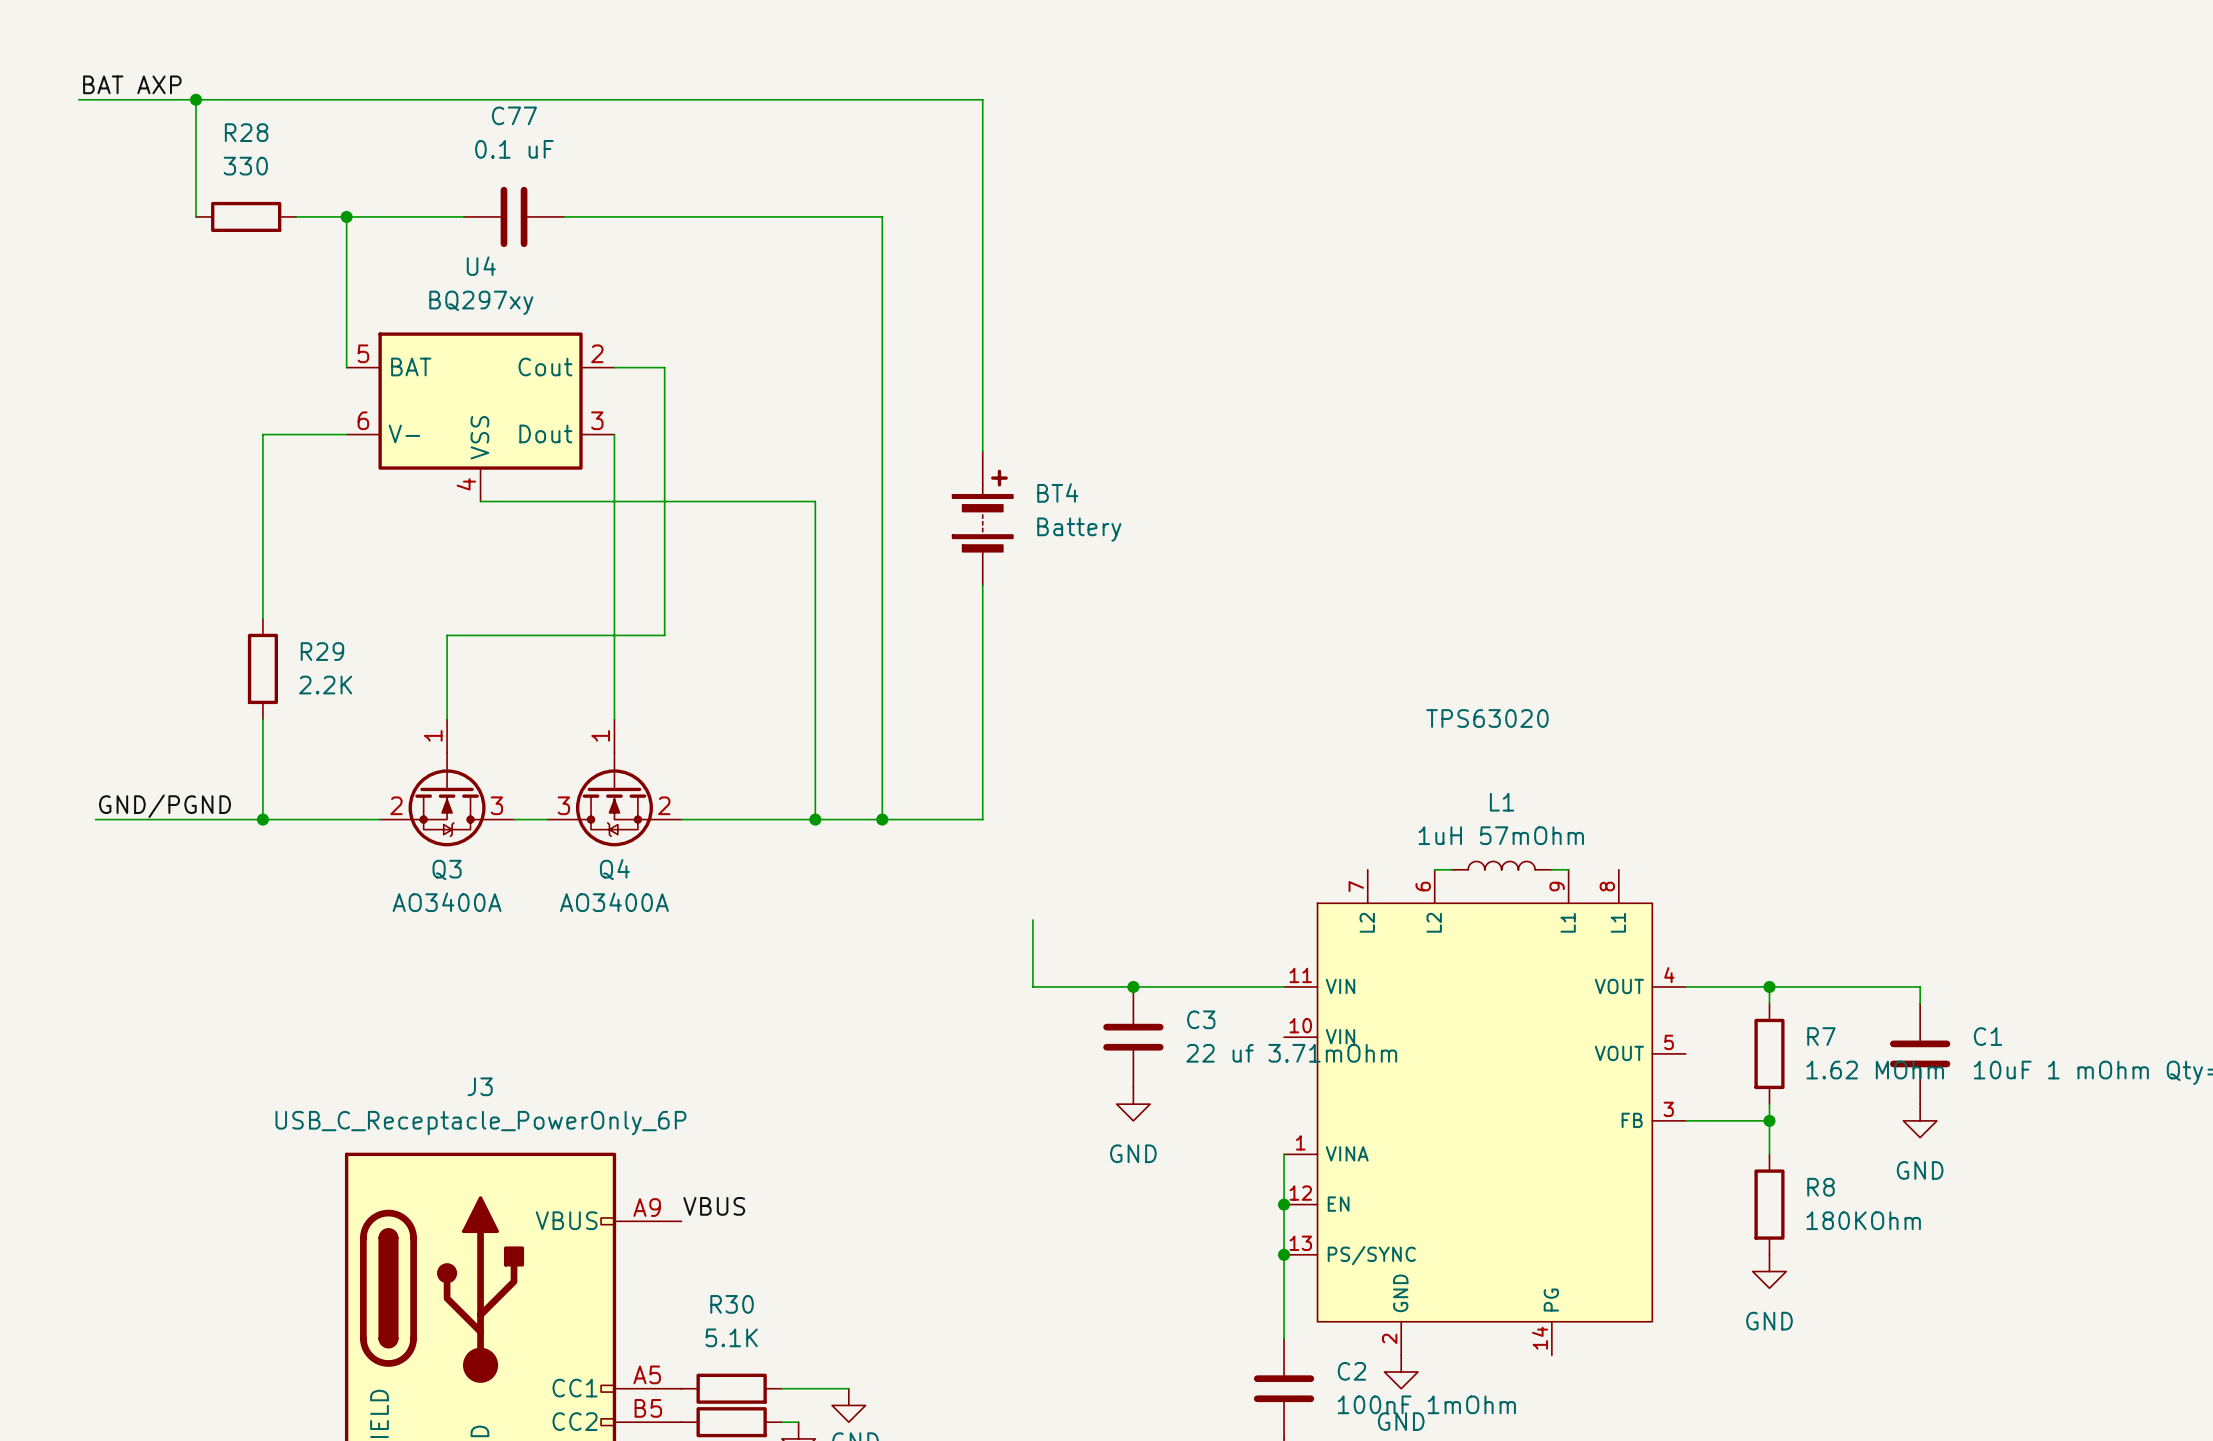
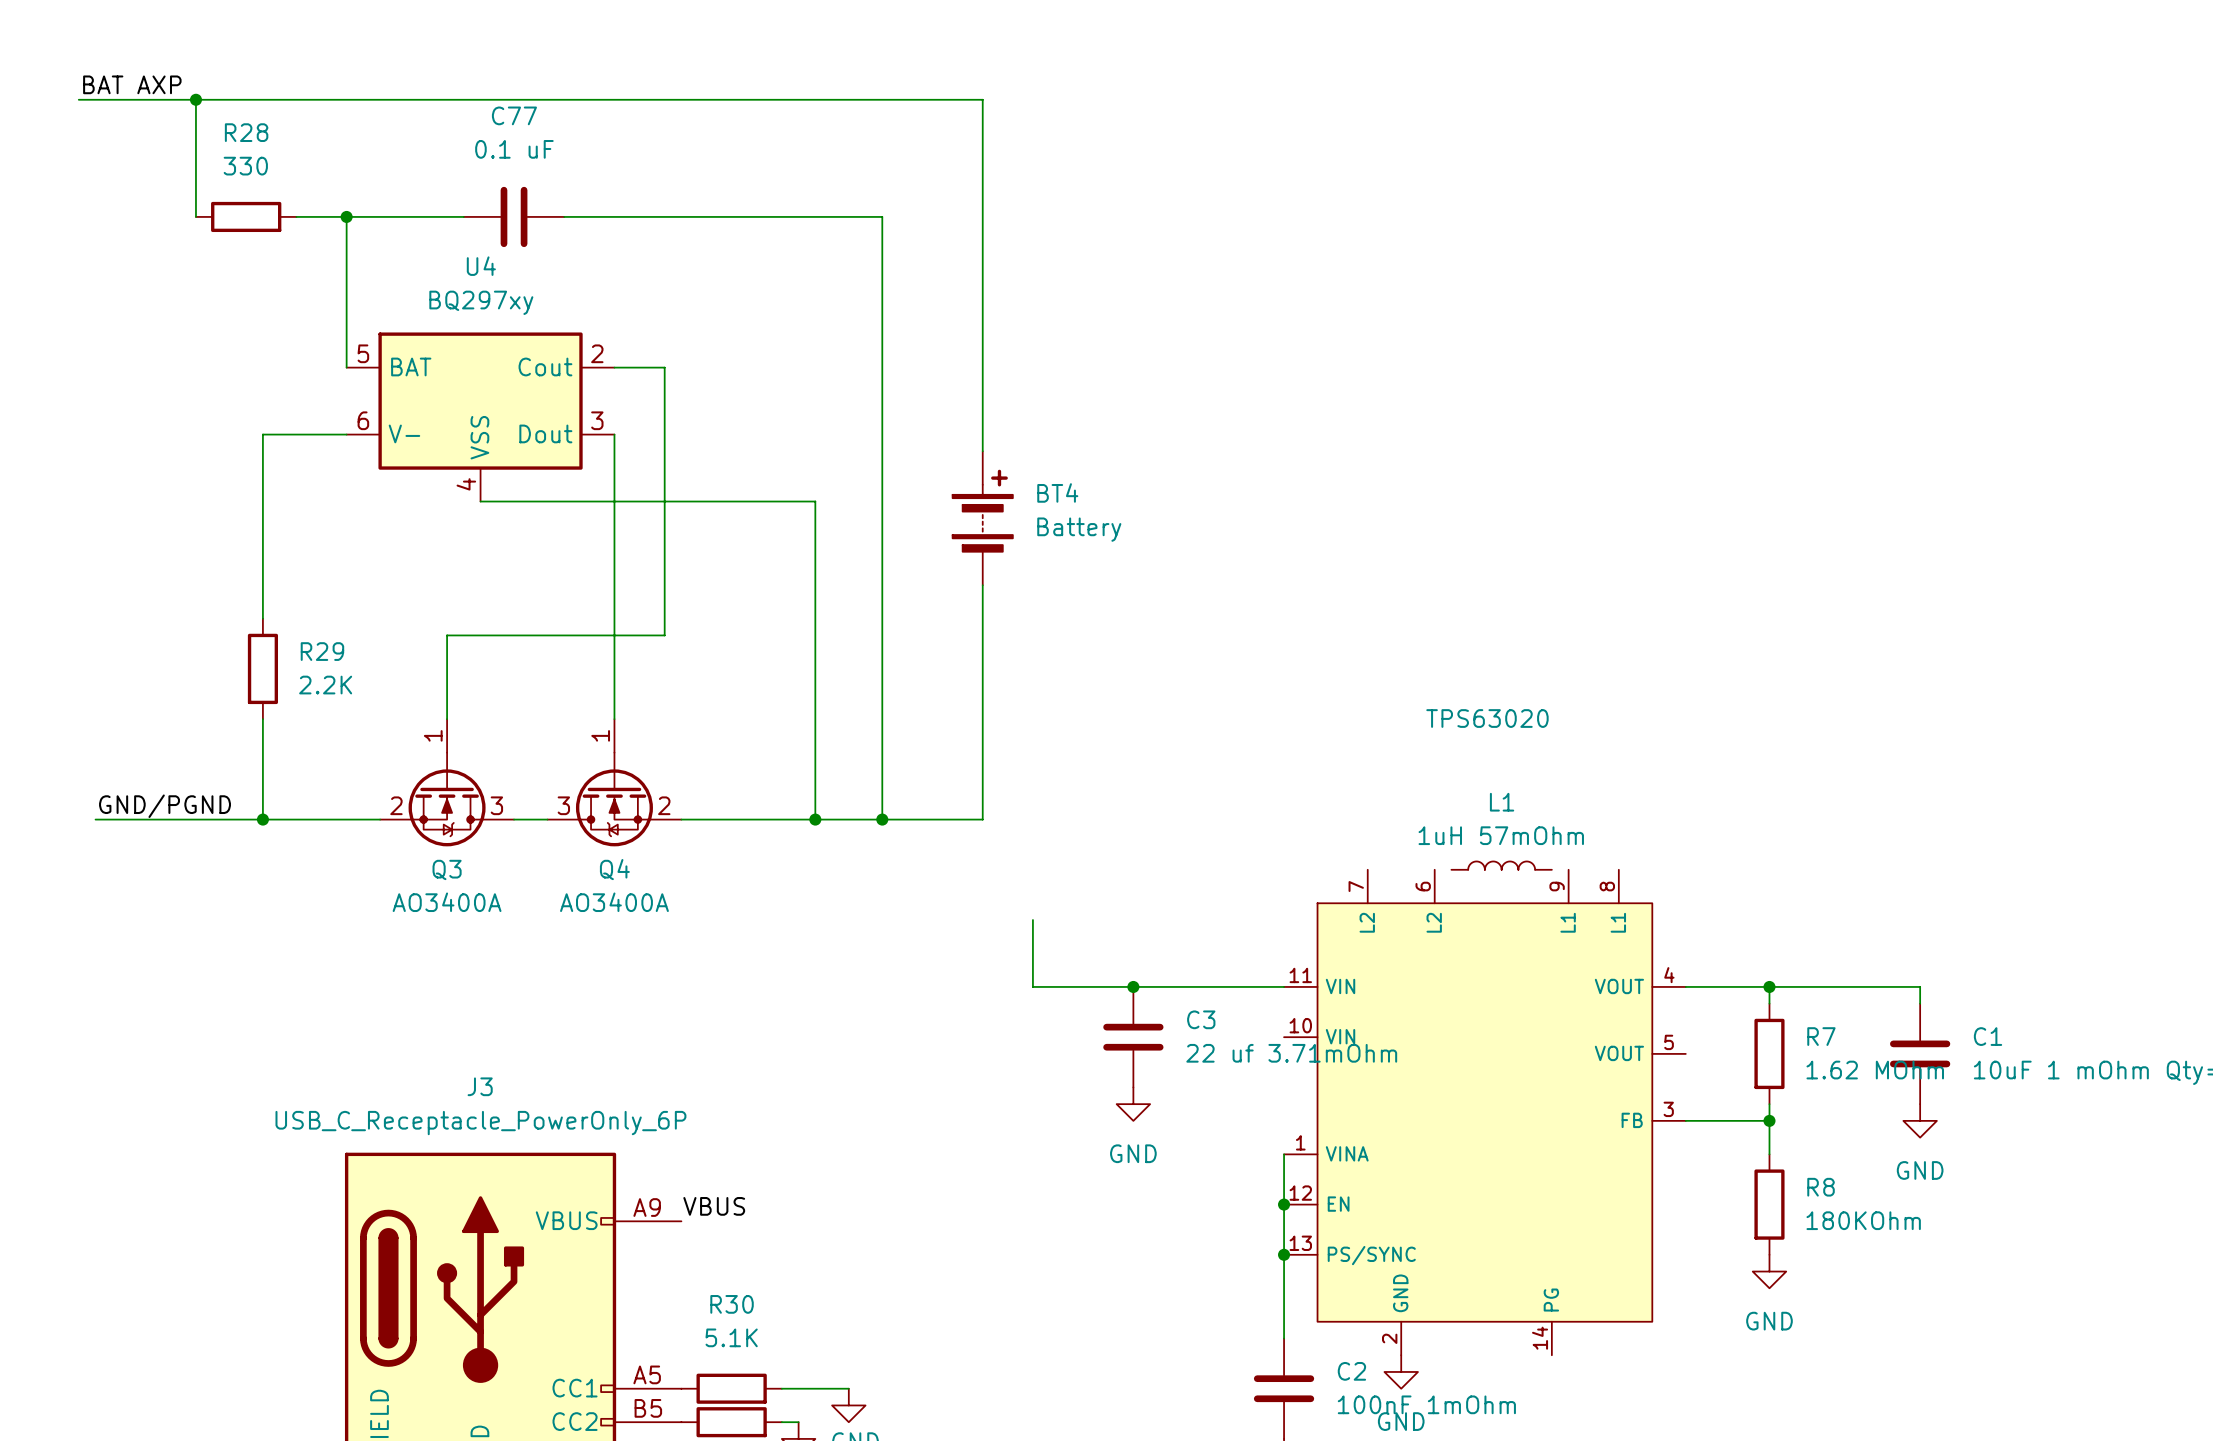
wire: (1434, 869) (1451, 869) -> none
wire: (1551, 869) (1568, 869) -> none

